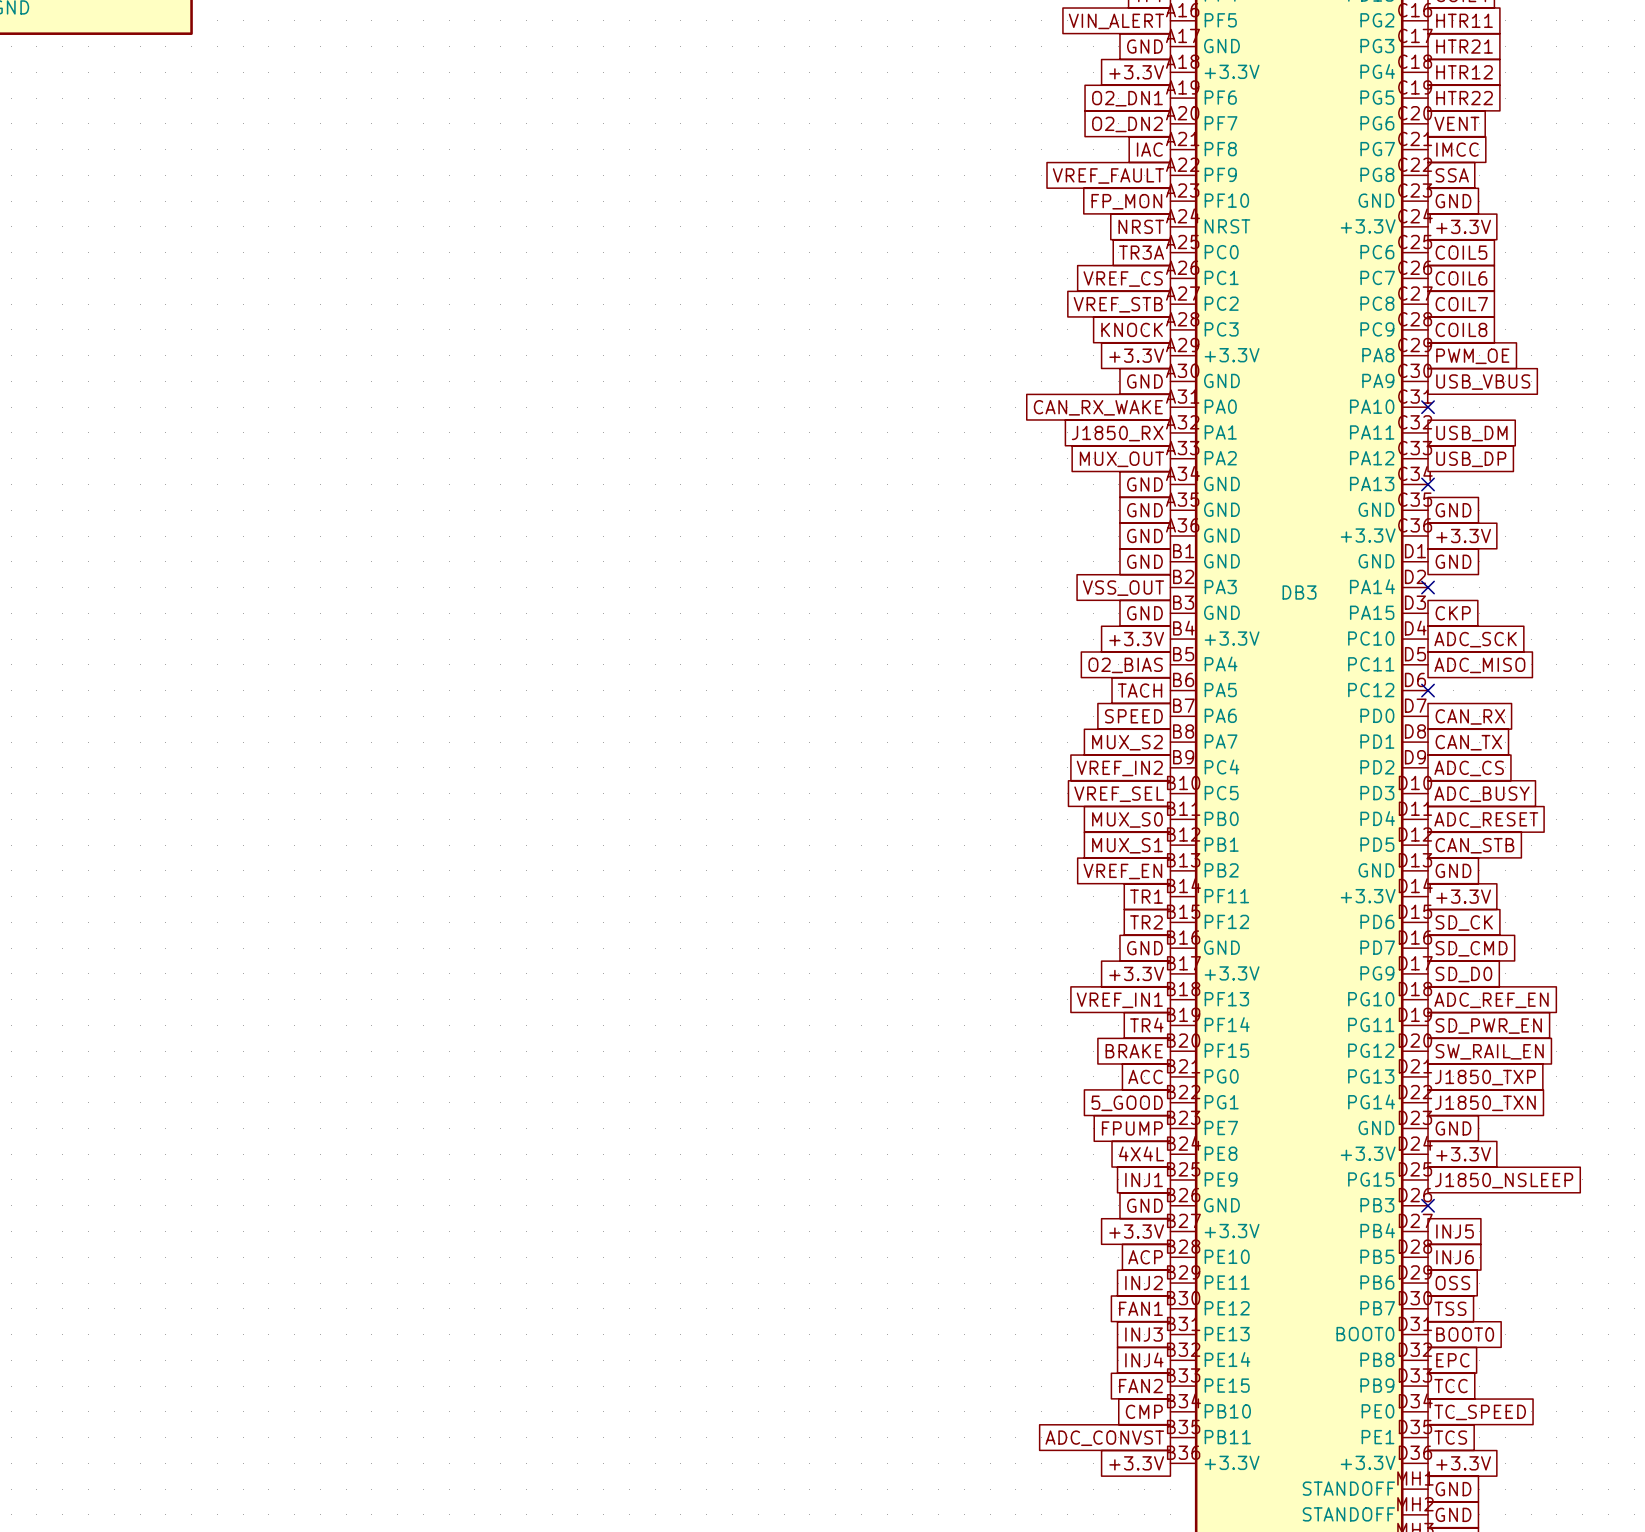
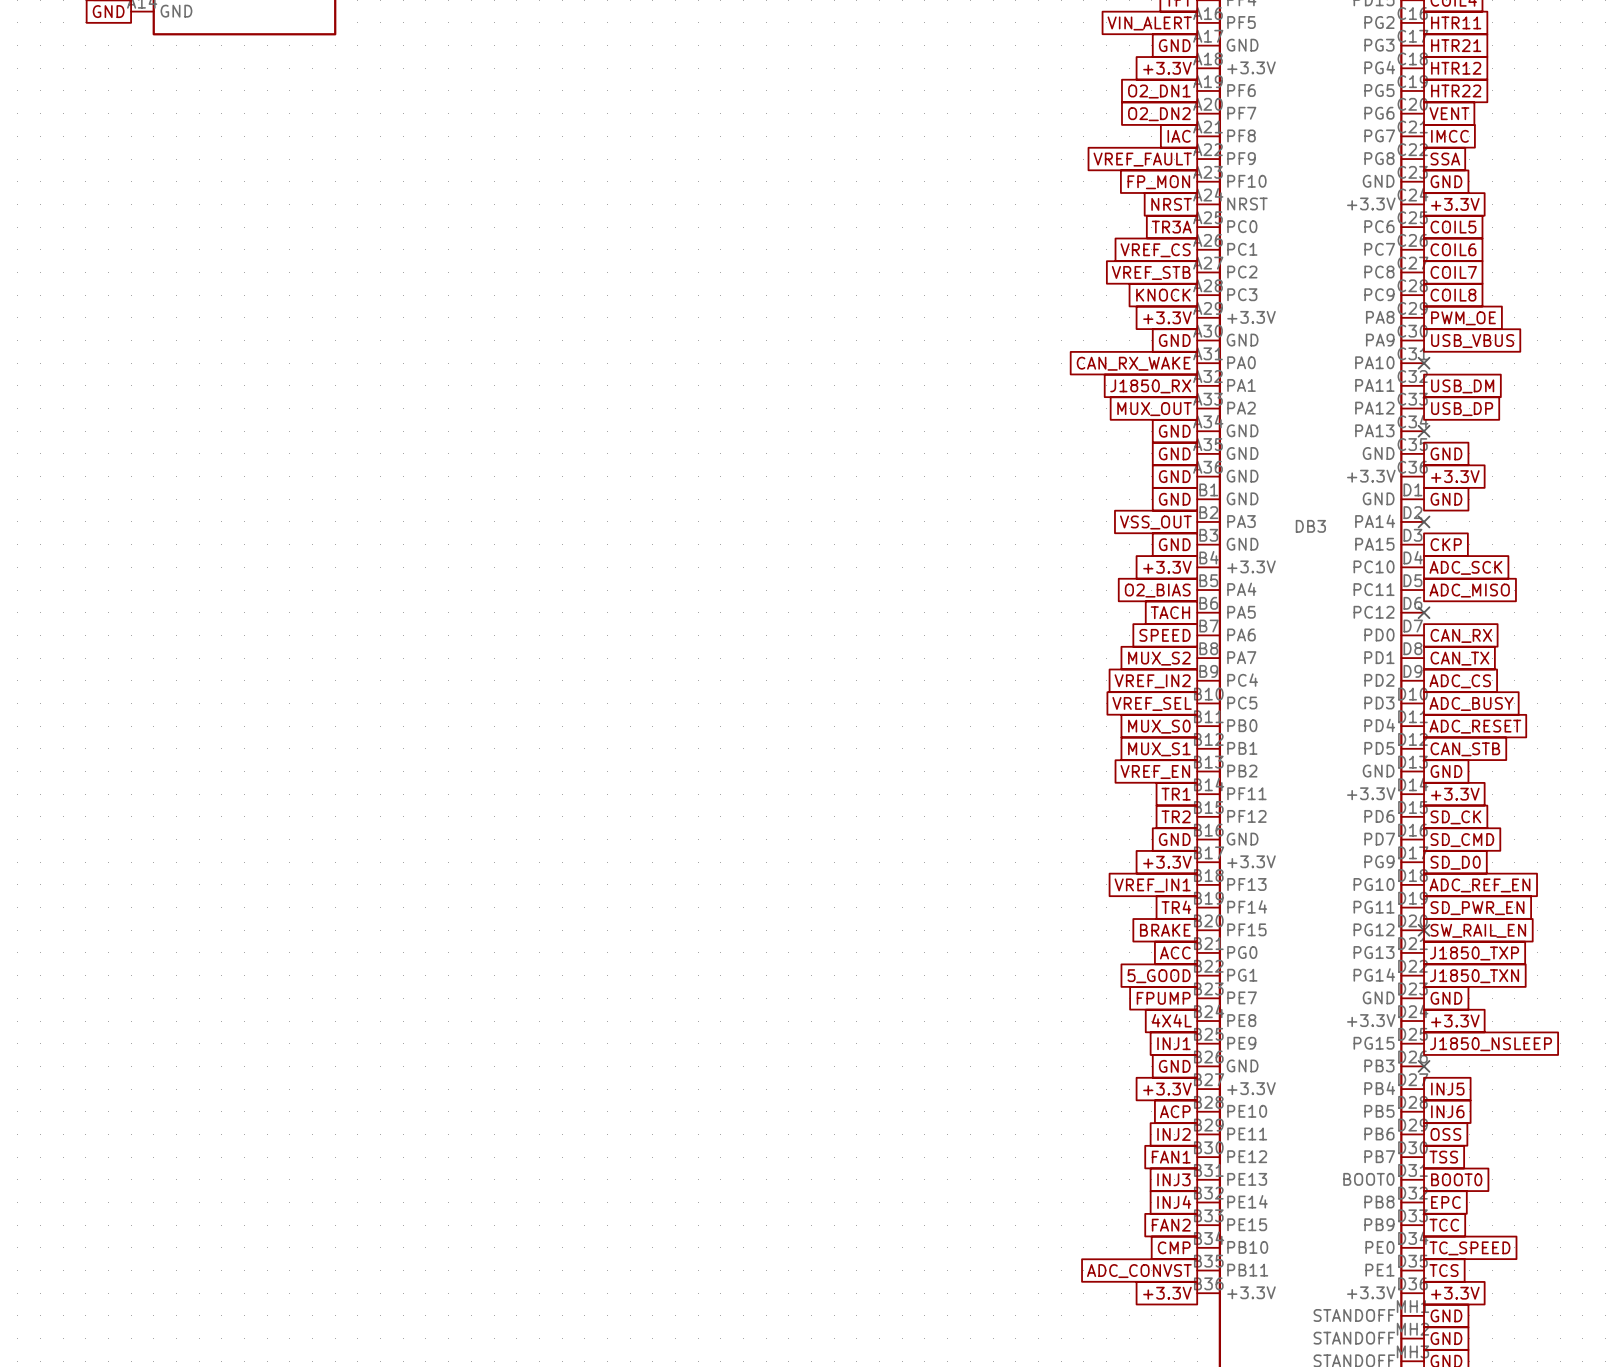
no-connect mark: none -> (1424, 930)

